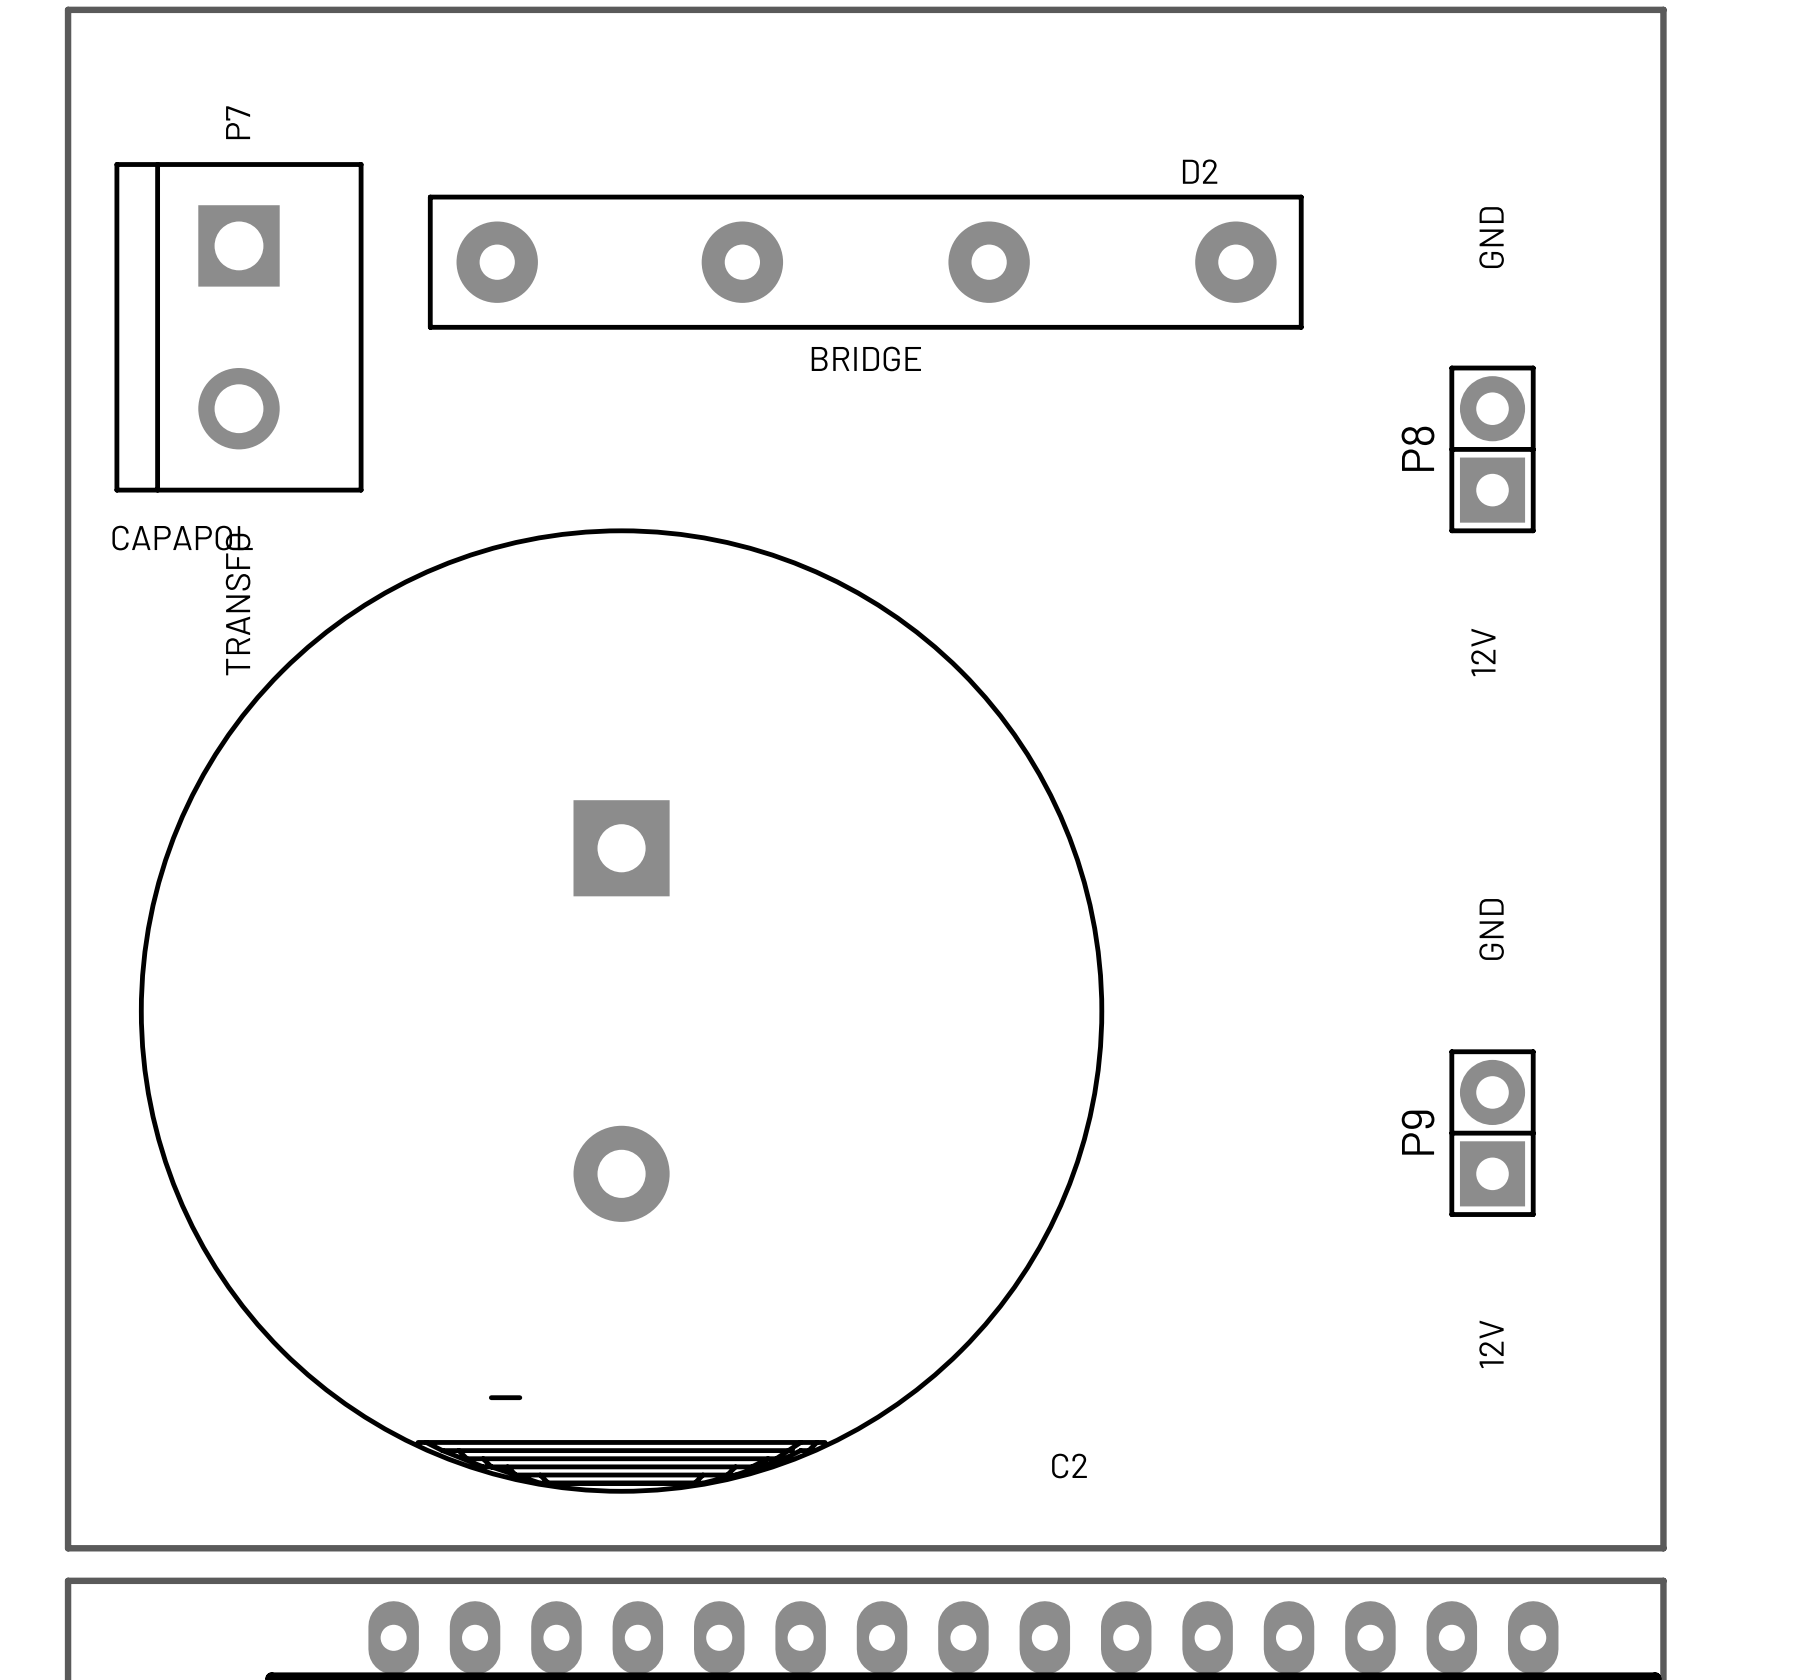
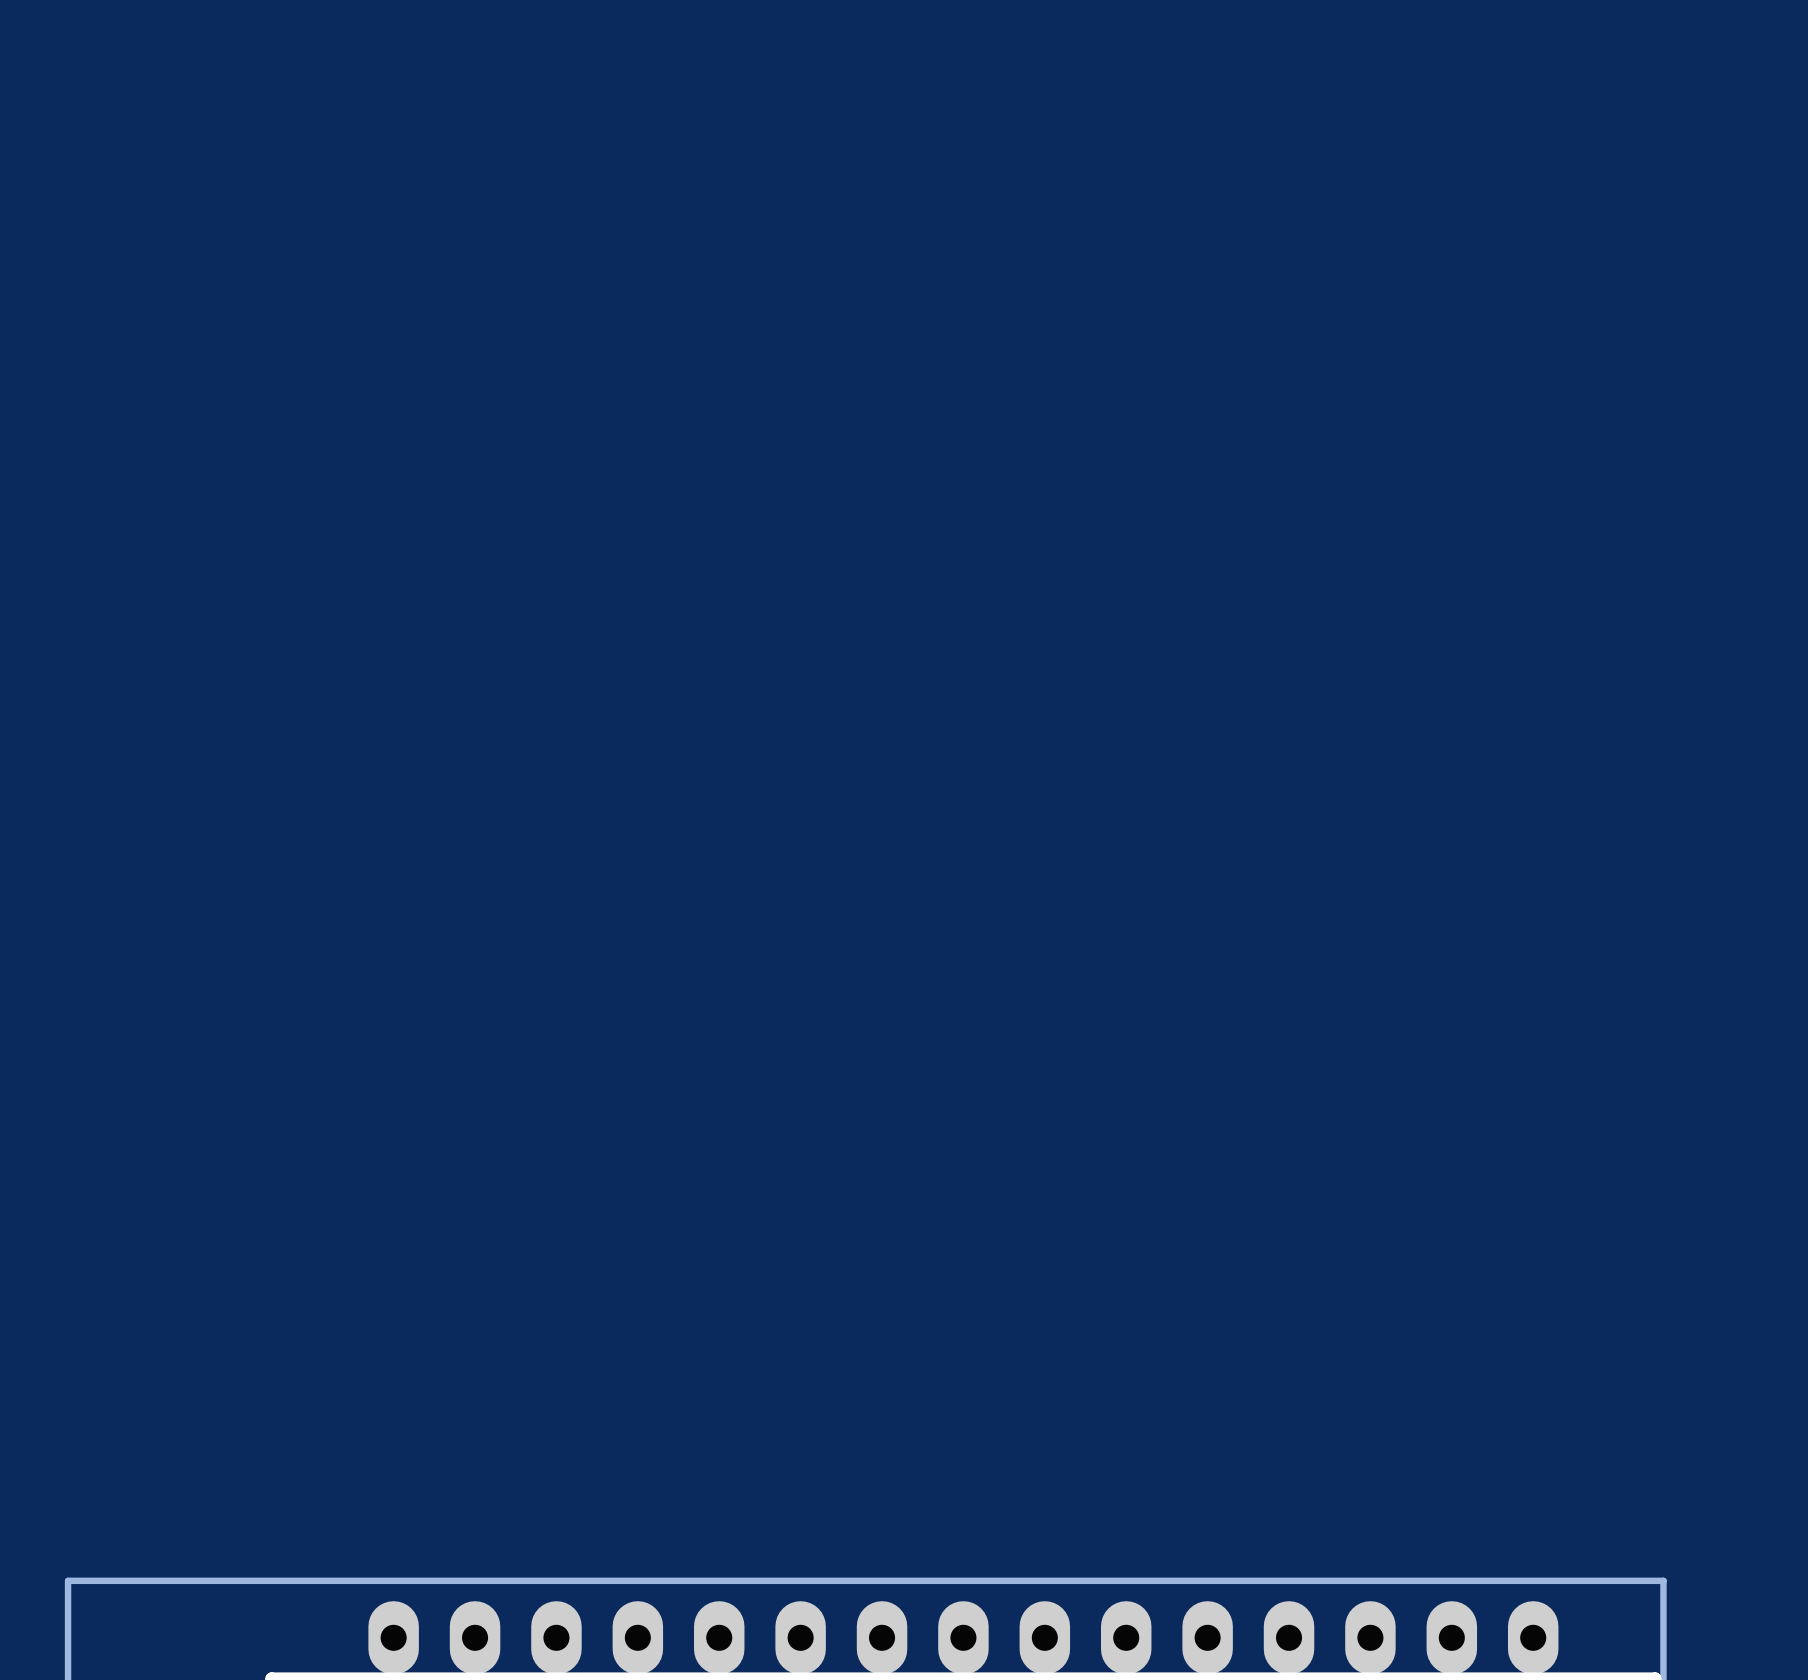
line: (68, 9) (1663, 9) (1663, 1548) (68, 1548) (68, 9) -> none
text: GND (1491, 237) -> none
D2: BRIDGE (865, 262) -> none
P7: TRANSFO (238, 327) -> none
P8: (1492, 449) -> none
text: 12V (1483, 652) -> none
text: GND (1491, 929) -> none
C2: CAPAPOL (621, 1011) -> none
P9: (1492, 1133) -> none
text: 12V (1491, 1344) -> none

